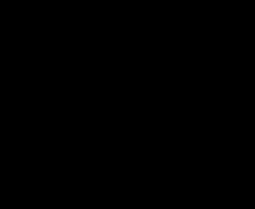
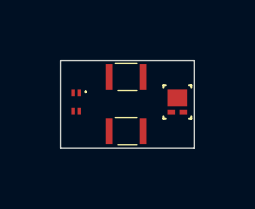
board edge: none -> (60, 60) (194, 60) (194, 148) (60, 148) (60, 60)
part: none -> (126, 76)
part: none -> (79, 101)
part: none -> (177, 101)
part: none -> (126, 131)

